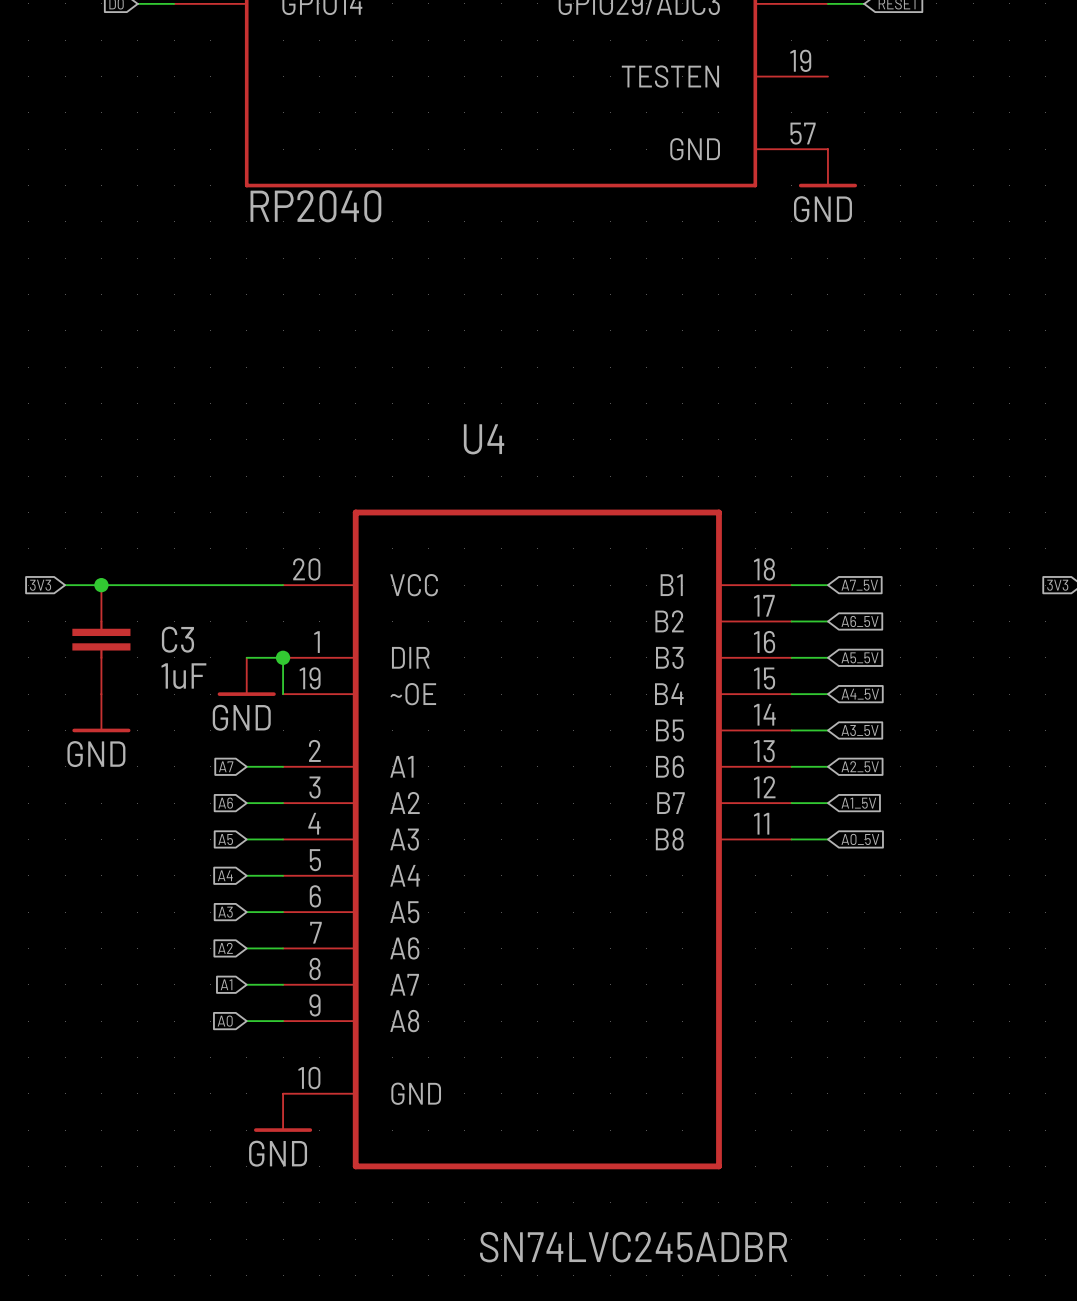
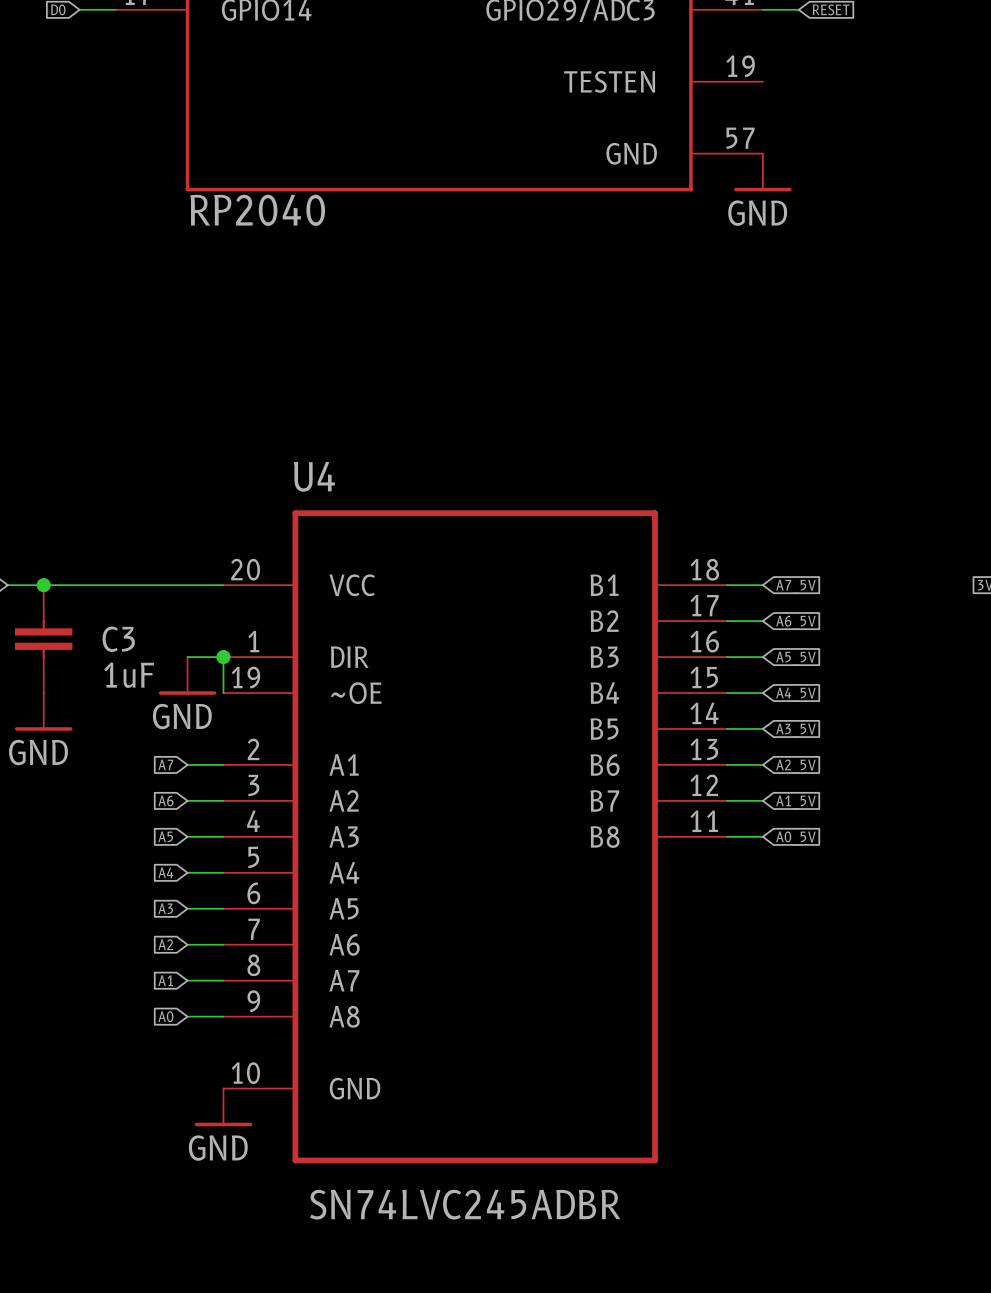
U4 name position: U4 (484, 439) -> U4 (314, 476)
U4 value position: SN74LVC245ADBR (633, 1247) -> SN74LVC245ADBR (465, 1204)

